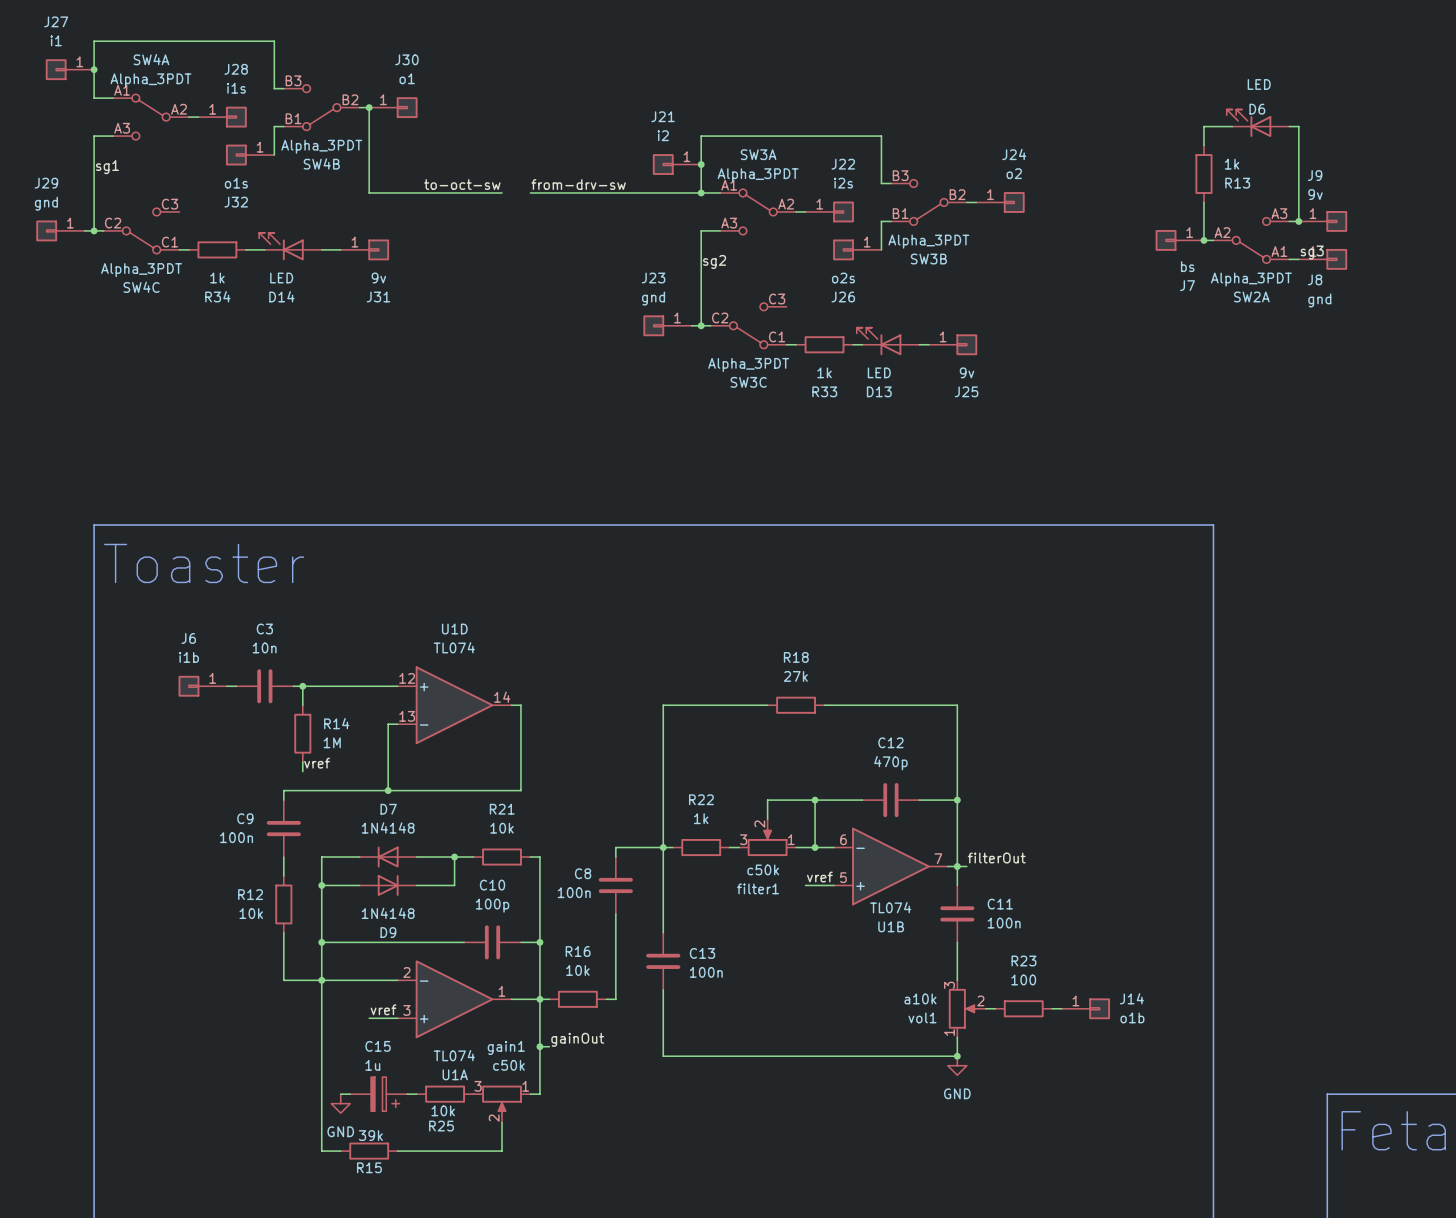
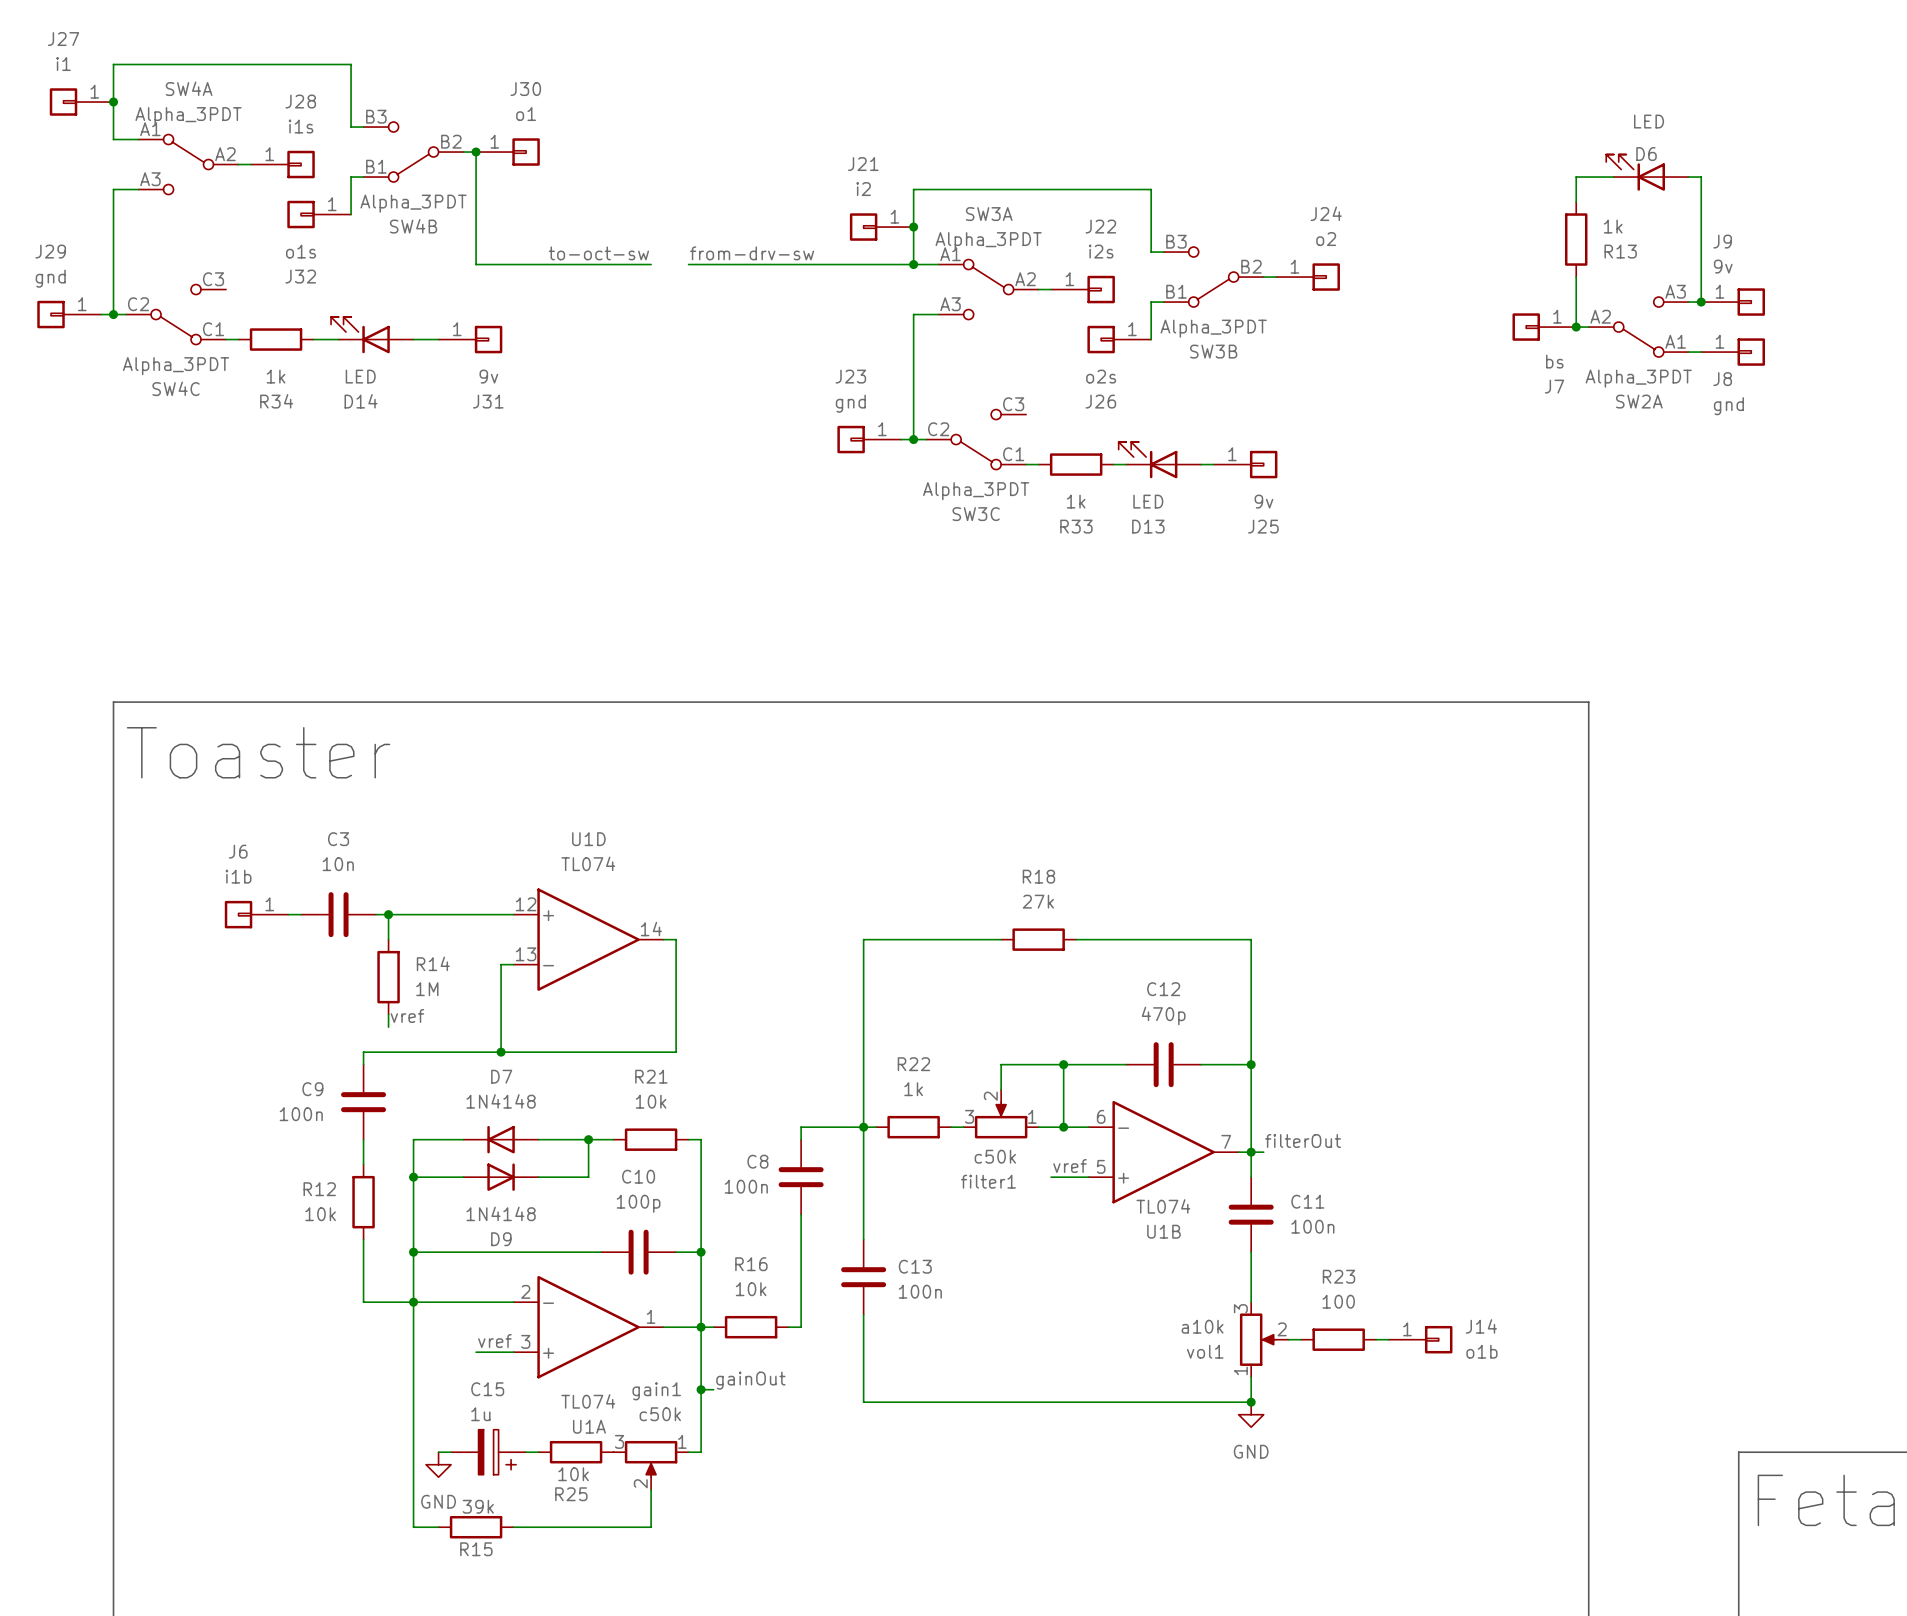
label: sg1 (107, 167) -> none
label: sg3 (1312, 252) -> none
label: sg2 (714, 261) -> none

